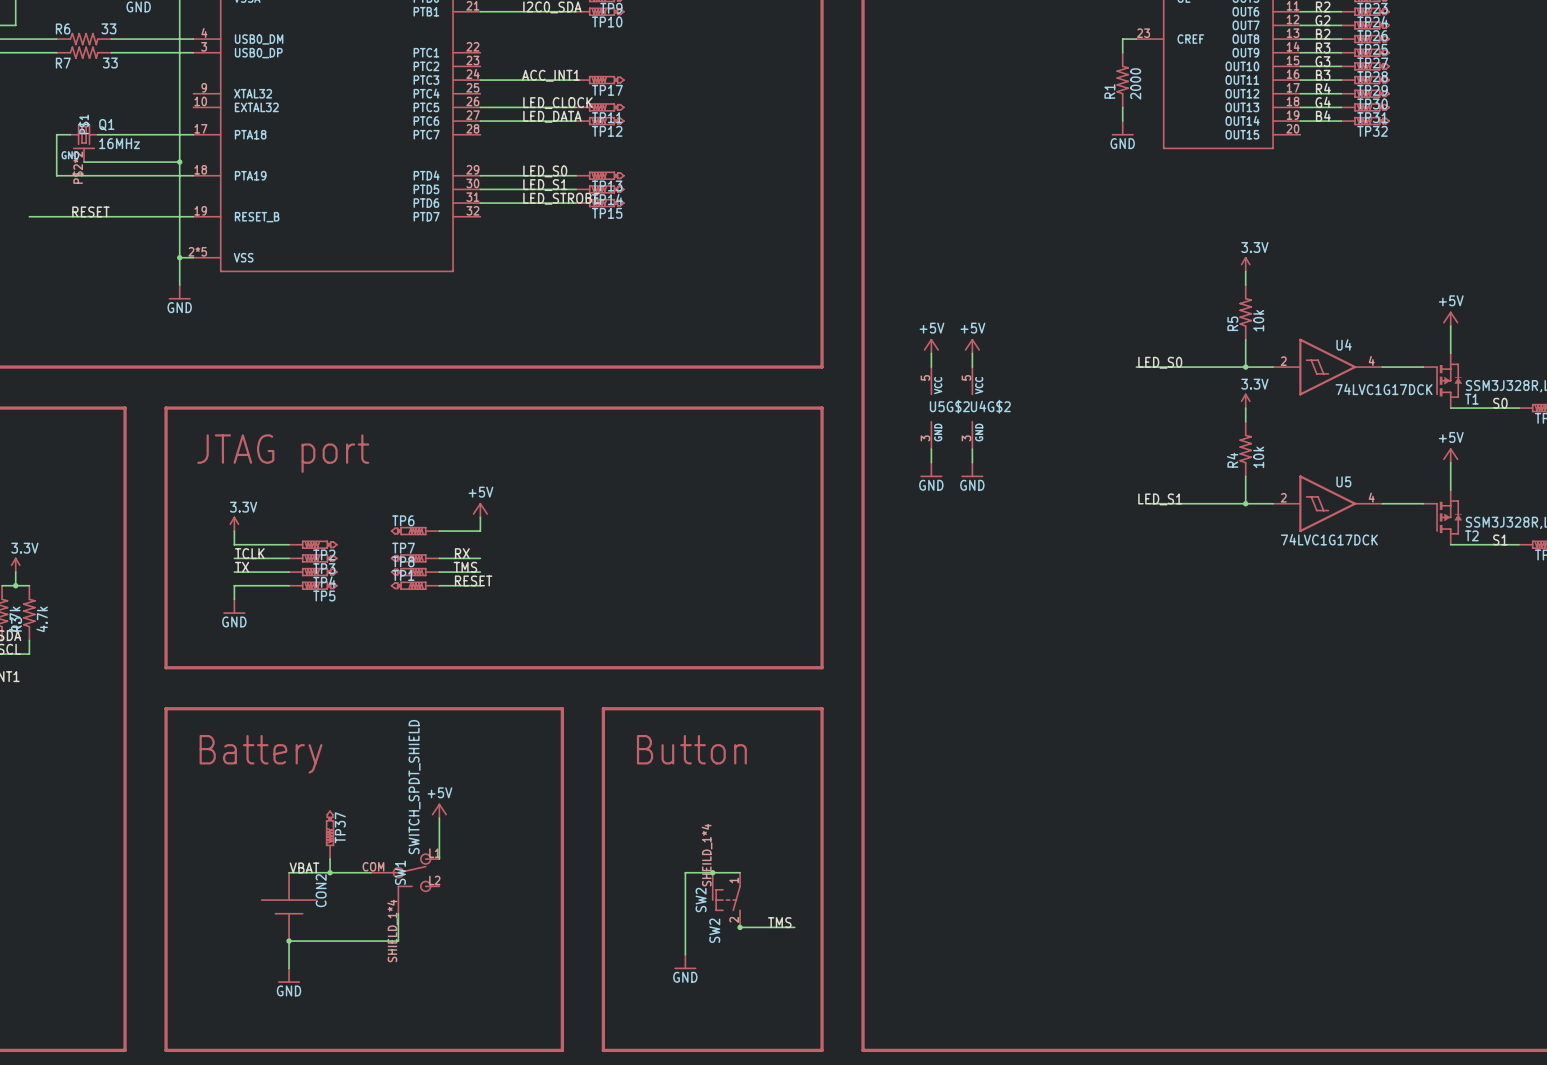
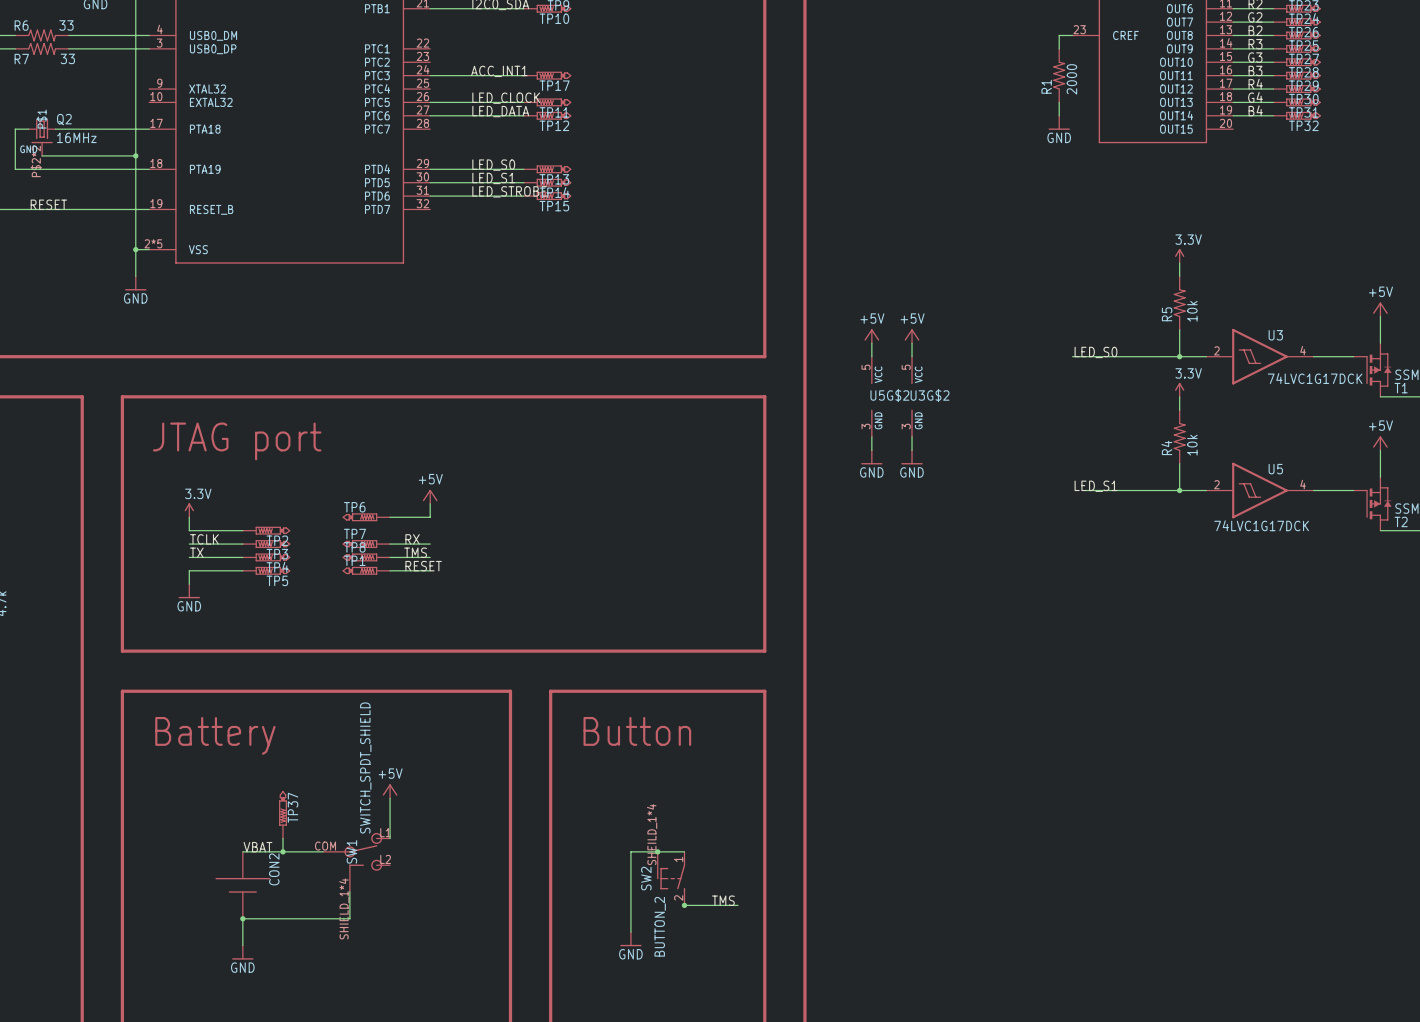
Q1 name: Q1 (106, 124) -> Q2 (64, 119)
U4 name: U4 (1344, 344) -> U3 (1275, 335)
U4G$2 name: U4G$2 (990, 406) -> U3G$2 (930, 395)
SW2 value: SW2 (714, 930) -> BUTTON_2 (660, 926)

